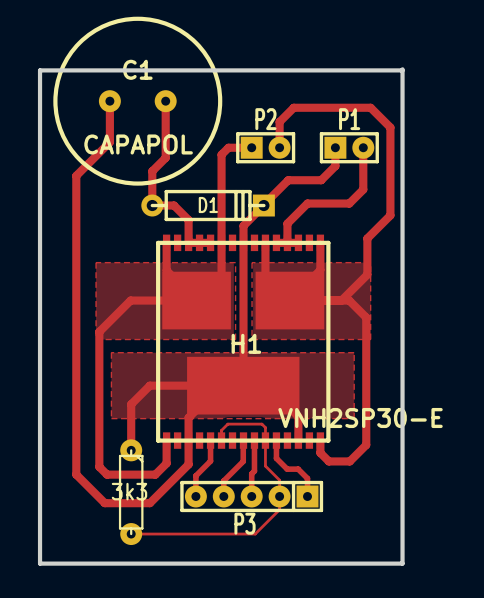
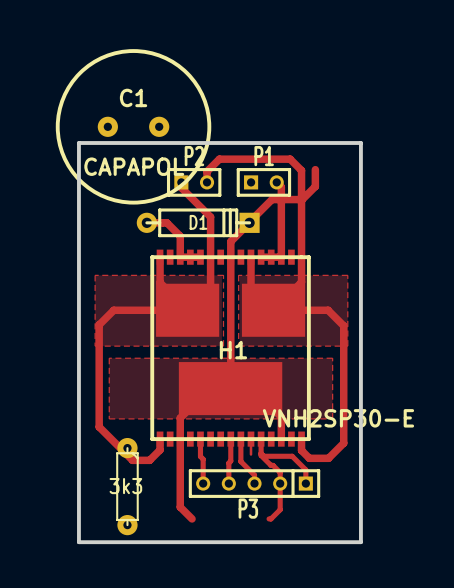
board edge: (402, 69) (402, 563) (40, 563) (40, 70) (402, 70) -> none
track: (109, 101) (109, 142) (76, 175) (76, 474) (104, 503) (149, 503) (188, 464) -> (192, 518) (180, 507) (180, 461)
track: (165, 101) (165, 157) (152, 171) (152, 205) -> none
board edge: none -> (78, 143) (78, 542) (360, 542) (360, 143) (78, 143)
P2 footprint: [236, 132, 296, 164] -> [166, 168, 222, 197]
P1 footprint: [319, 132, 379, 164] -> [236, 168, 292, 197]
track: (251, 147) (228, 147) (221, 154) (221, 199) -> (181, 182) (181, 187) (210, 217)
track: (279, 147) (279, 121) (293, 107) (370, 107) (390, 127) (390, 215) (367, 238) (367, 274) (341, 300) -> none
track: (363, 147) (363, 189) (349, 203) (307, 203) (287, 223) (287, 242) -> none
track: none -> (207, 182) (207, 171) (219, 159) (290, 159) (301, 170) (301, 257)
track: none -> (276, 182) (281, 187) (281, 257)
track: (130, 300) (99, 331) (99, 466) (107, 474) (155, 474) (166, 463) (166, 452) -> (126, 310) (113, 310) (99, 324) (99, 426) (132, 460) (149, 460) (160, 449)
track: (220, 385) (149, 385) (131, 404) (131, 450) -> none
track: (221, 440) (221, 430) (227, 424) (261, 424) (265, 427) (265, 440) -> none
track: (243, 440) (243, 461) (223, 480) (223, 496) -> (230, 439) (228, 483)
track: none -> (261, 453) (263, 456) (292, 456) (305, 469) (305, 483)
track: (265, 457) (265, 466) (279, 480) (279, 509) (255, 534) (131, 534) -> none
track: (210, 459) (195, 475) (195, 496) -> (200, 456) (203, 459) (203, 483)
track: (254, 464) (254, 471) (251, 473) (251, 496) -> (240, 461) (254, 475) (254, 483)
track: (289, 469) (298, 469) (307, 478) (307, 496) -> (273, 465) (280, 472) (280, 509) (269, 518)
P3 footprint: [180, 480, 324, 513] -> [188, 469, 321, 498]

